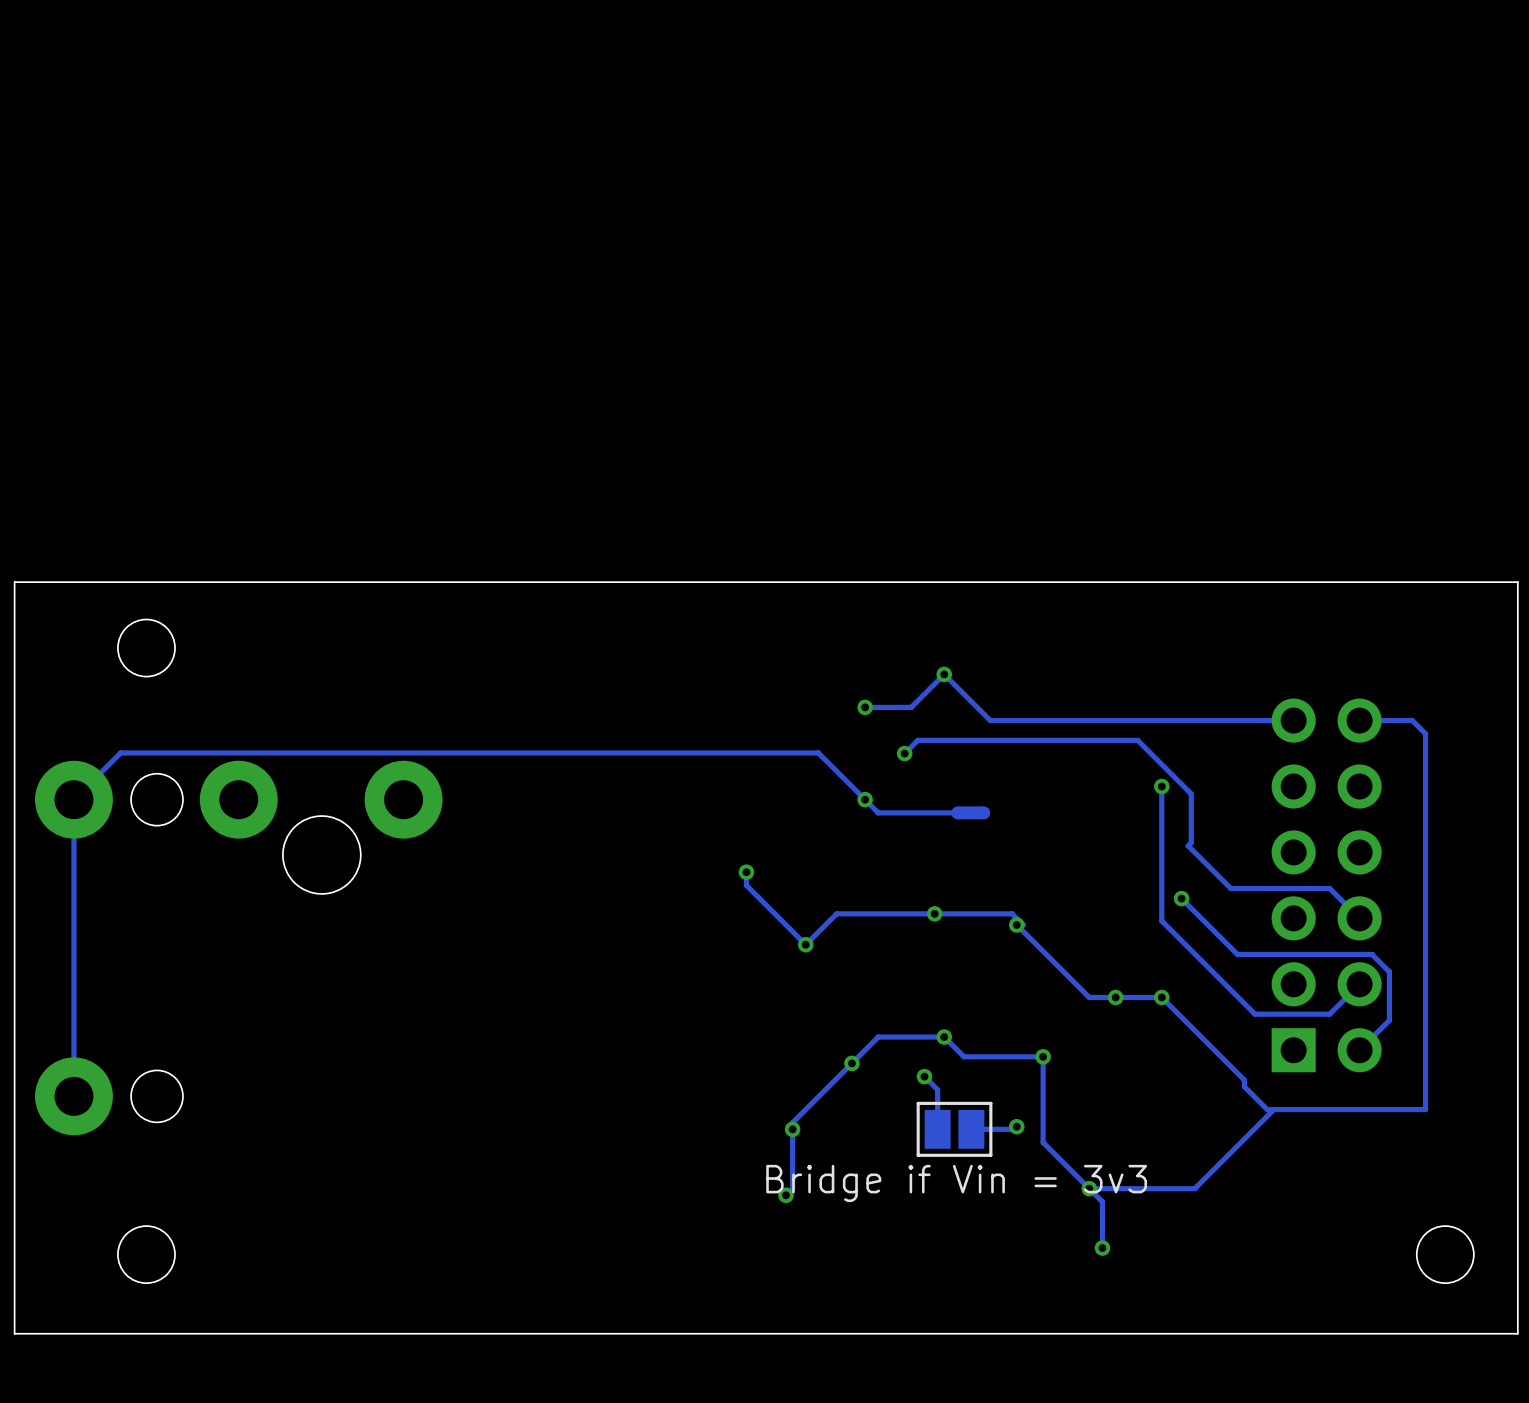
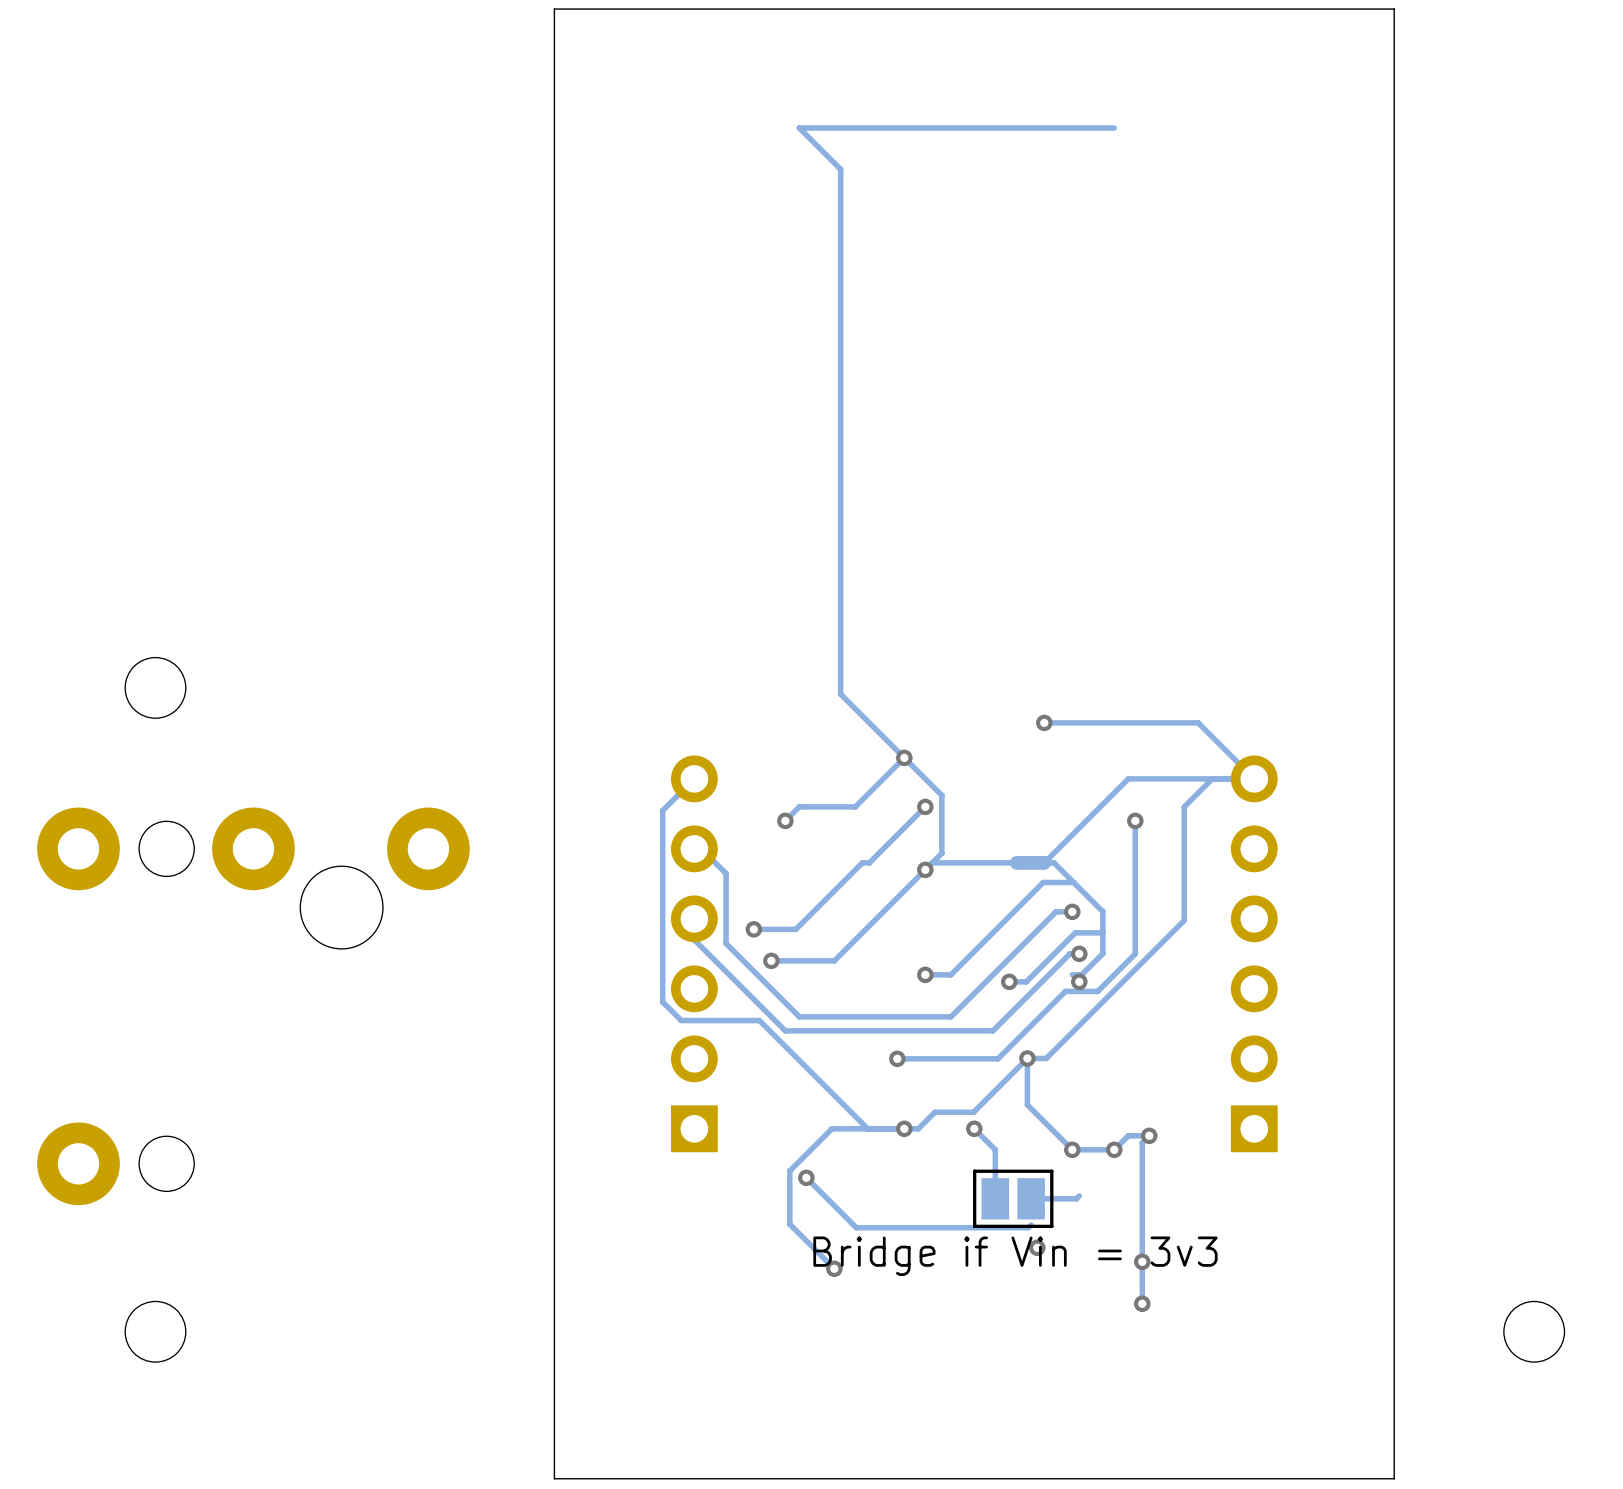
board edge: none -> (1394, 9) (554, 9) (554, 1478) (1394, 1478) (1394, 9)
track: none -> (1114, 128) (799, 128) (840, 169) (840, 694) (941, 795) (941, 853) (834, 960) (771, 960)
board edge: (1517, 582) (14, 582) (14, 1333) (1517, 1333) (1517, 582) -> none
via position: (944, 674) -> (1044, 722)
track: none -> (1044, 722) (1198, 722) (1254, 778) (1128, 778) (1044, 862) (1054, 862) (1102, 911) (1102, 953) (1081, 974) (1072, 974)
track: (865, 707) (911, 707) (944, 674) (990, 720) (1293, 720) -> none
via position: (865, 707) -> (904, 757)
track: none -> (904, 757) (855, 806) (799, 806) (785, 820)
track: (1359, 720) (1412, 720) (1425, 733) (1425, 1109) (1267, 1109) (1244, 1086) (1244, 1080) (1161, 997) (1089, 997) (1016, 924) (1023, 924) (1012, 913) (836, 913) (805, 944) (746, 885) (746, 872) -> none
track: none -> (694, 778) (662, 810) (662, 1001) (681, 1020) (759, 1020) (867, 1128)
track: none -> (1212, 778) (1184, 806) (1184, 920) (1046, 1058) (1027, 1058)
track: (904, 753) (917, 740) (1137, 740) (1191, 793) (1191, 842) (1188, 845) (1230, 888) (1329, 888) (1359, 918) -> none
via: (904, 753) -> none
track: none -> (925, 806) (869, 862) (862, 862) (795, 929) (753, 929)
via: none -> (925, 806)
via: none -> (785, 820)
track: none -> (1135, 820) (1135, 953) (1097, 991) (1065, 991) (998, 1058) (897, 1058)
via: none -> (1135, 820)
track: (1161, 786) (1161, 921) (1254, 1014) (1329, 1014) (1359, 984) -> none
via: (1161, 786) -> none
track: none -> (694, 848) (701, 848) (726, 873) (726, 943) (799, 1016) (950, 1016) (1055, 911) (1072, 911)
via: (865, 799) -> none
track: (878, 812) (818, 752) (120, 752) (73, 799) (73, 1096) -> none
via: none -> (925, 869)
track: none -> (1073, 882) (1043, 882) (950, 974) (925, 974)
via: none -> (1072, 911)
track: none -> (694, 918) (694, 939) (785, 1030) (992, 1030) (1069, 953) (1079, 953)
via: (746, 872) -> none
via: none -> (753, 929)
track: none -> (1102, 932) (1075, 932) (1026, 981) (1009, 981)
part: (1326, 885) -> none
part: none -> (694, 953)
via: none -> (1079, 953)
track: (1181, 898) (1237, 954) (1371, 954) (1389, 971) (1389, 1020) (1359, 1050) -> none
part: none -> (1254, 953)
via: (1181, 898) -> none
via: none -> (771, 960)
via position: (934, 913) -> (1009, 981)
via: none -> (925, 974)
via: (805, 944) -> none
via: none -> (897, 1058)
track: none -> (1027, 1058) (1027, 1104) (1072, 1149) (1114, 1149) (1128, 1135) (1149, 1135) (1142, 1142) (1142, 1303)
via: none -> (1027, 1058)
via: (1115, 997) -> none
via: (1161, 997) -> none
via: (944, 1037) -> none
via: (1043, 1056) -> none
via: none -> (1149, 1135)
track: (924, 1076) (937, 1089) -> (974, 1128) (995, 1149) (995, 1156)
via position: (924, 1076) -> (974, 1128)
via: none -> (1072, 1149)
via: none -> (1114, 1149)
track: none -> (806, 1177) (856, 1227) (1028, 1227) (1031, 1224)
track: (1273, 1109) (1194, 1188) (1089, 1188) -> none
via: (1016, 1126) -> none
via position: (792, 1129) -> (806, 1177)
via: none -> (1037, 1247)
via position: (1089, 1188) -> (1142, 1261)
track: (786, 1195) (792, 1188) (792, 1122) (878, 1037) (944, 1037) (964, 1056) (1043, 1056) (1043, 1142) (1102, 1201) (1102, 1248) -> (834, 1268) (789, 1224) (789, 1170) (831, 1128) (918, 1128) (934, 1112) (973, 1112) (1027, 1058)
via: none -> (1142, 1303)
via: (1102, 1248) -> none

